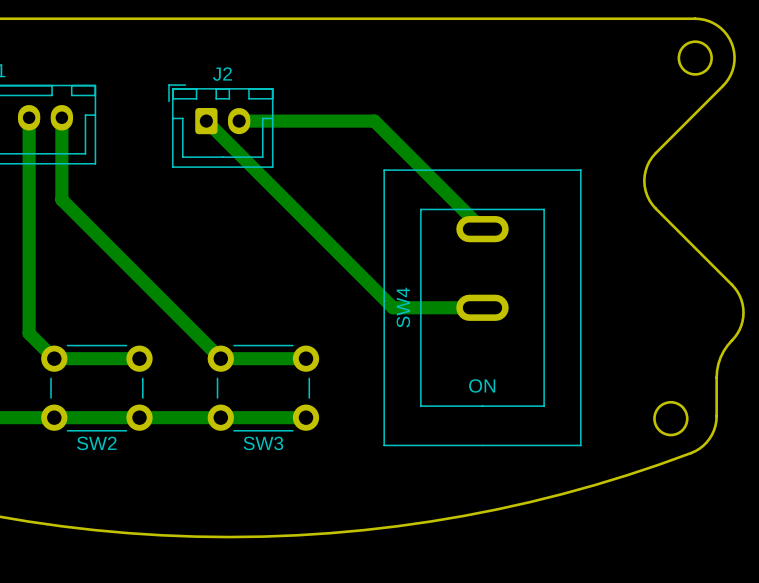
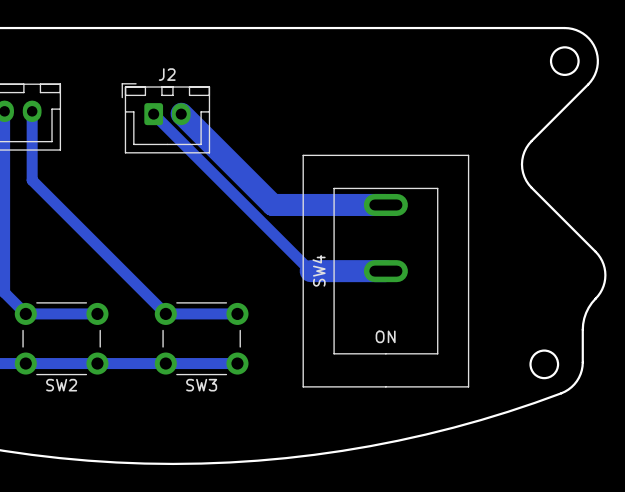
bottom track: (239, 121) (374, 121) (482, 229) -> (181, 113) (272, 204) (385, 204)
bottom track width: thin (393, 307) (482, 307) -> thick (310, 271) (385, 271)

